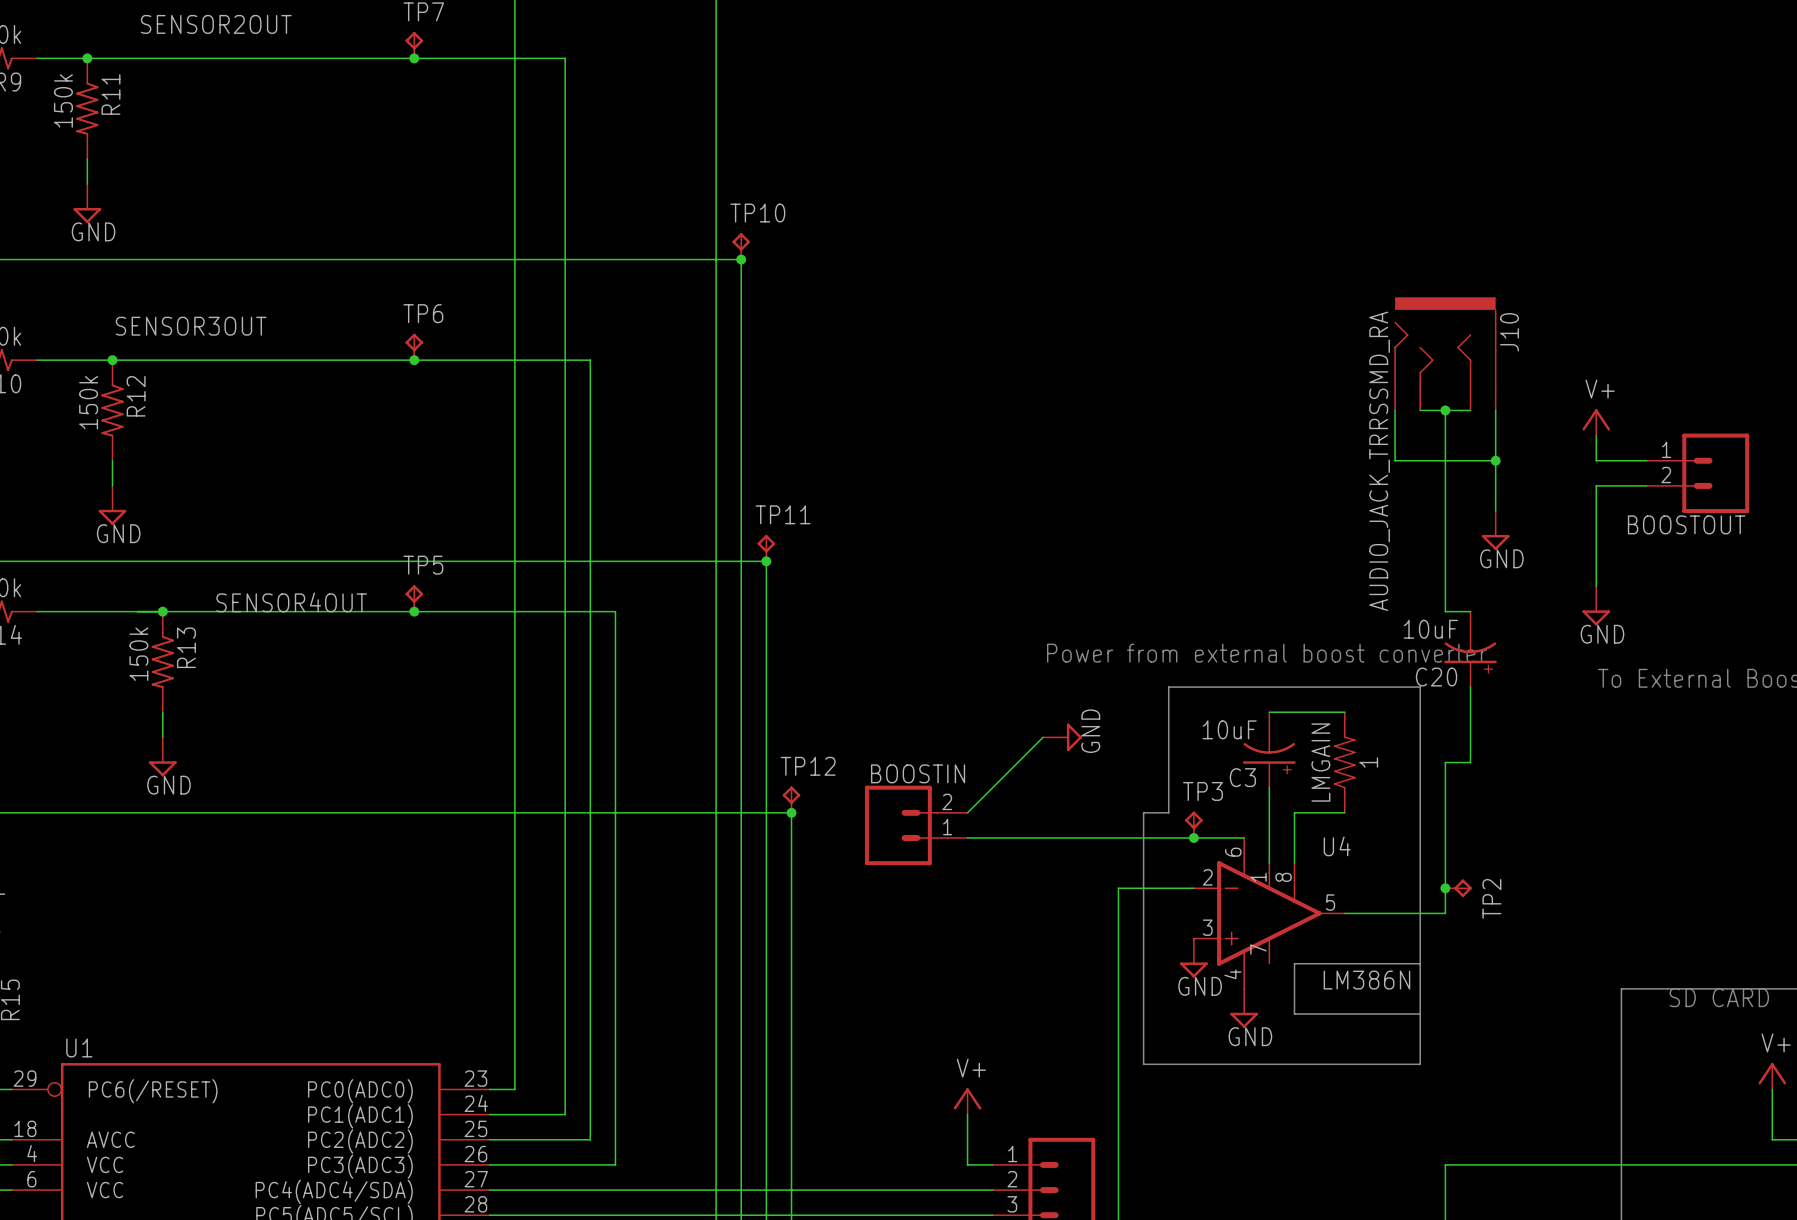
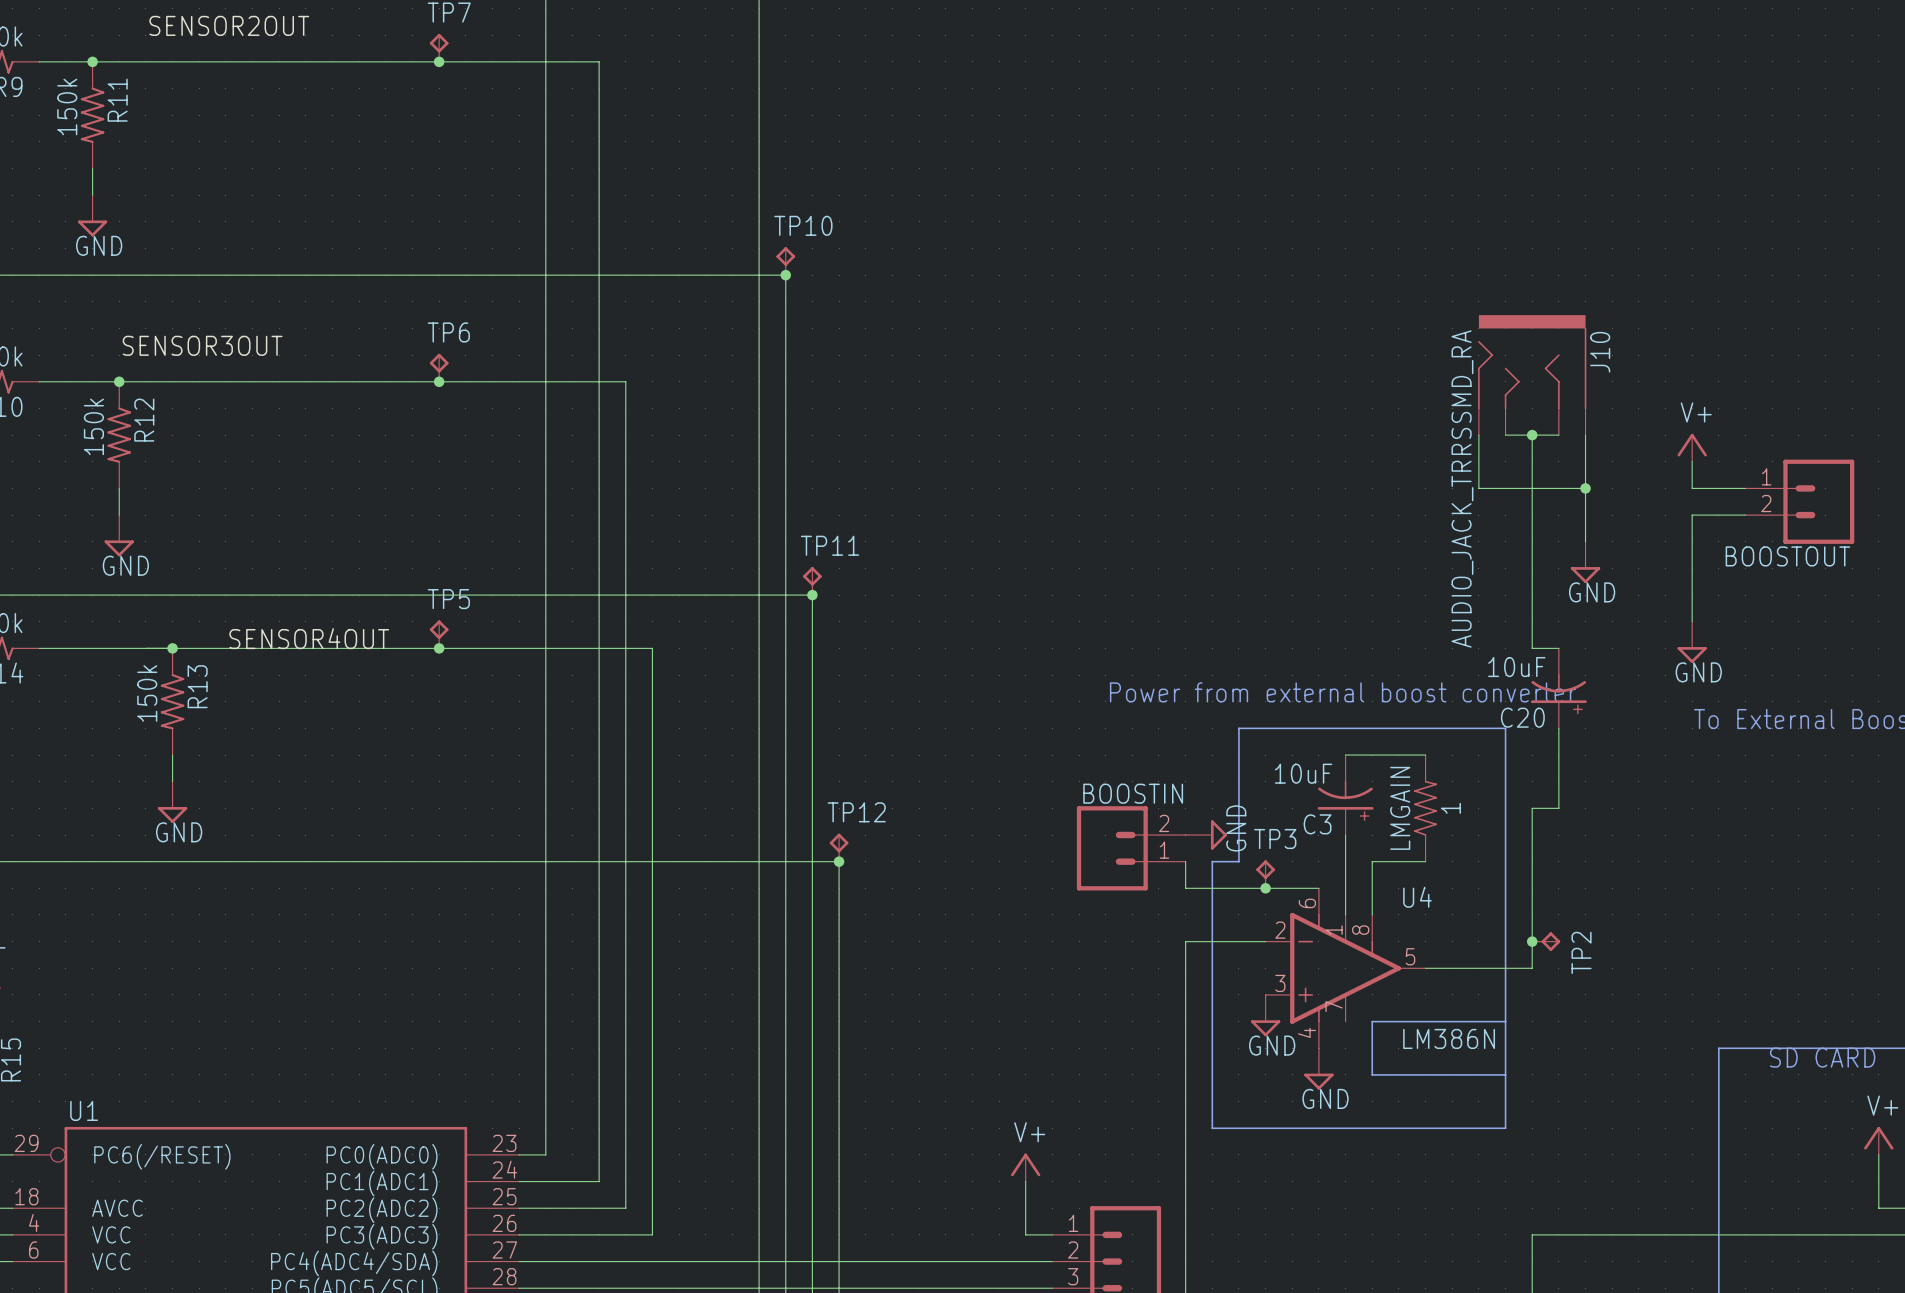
wire: (1043, 737) (967, 812) -> none
power symbol position: GND (1062, 737) -> GND (1206, 835)
BOOSTIN position: (916, 825) -> (1131, 848)
wire: (967, 837) (1118, 837) -> (1185, 861) (1185, 888)

